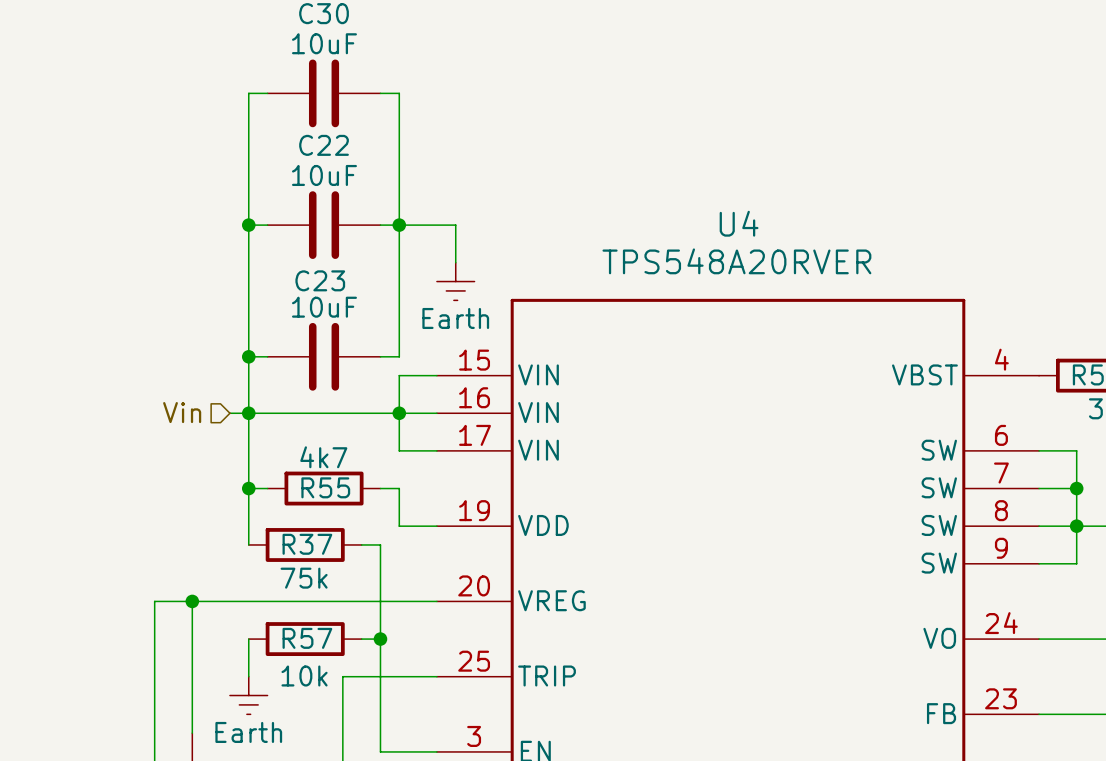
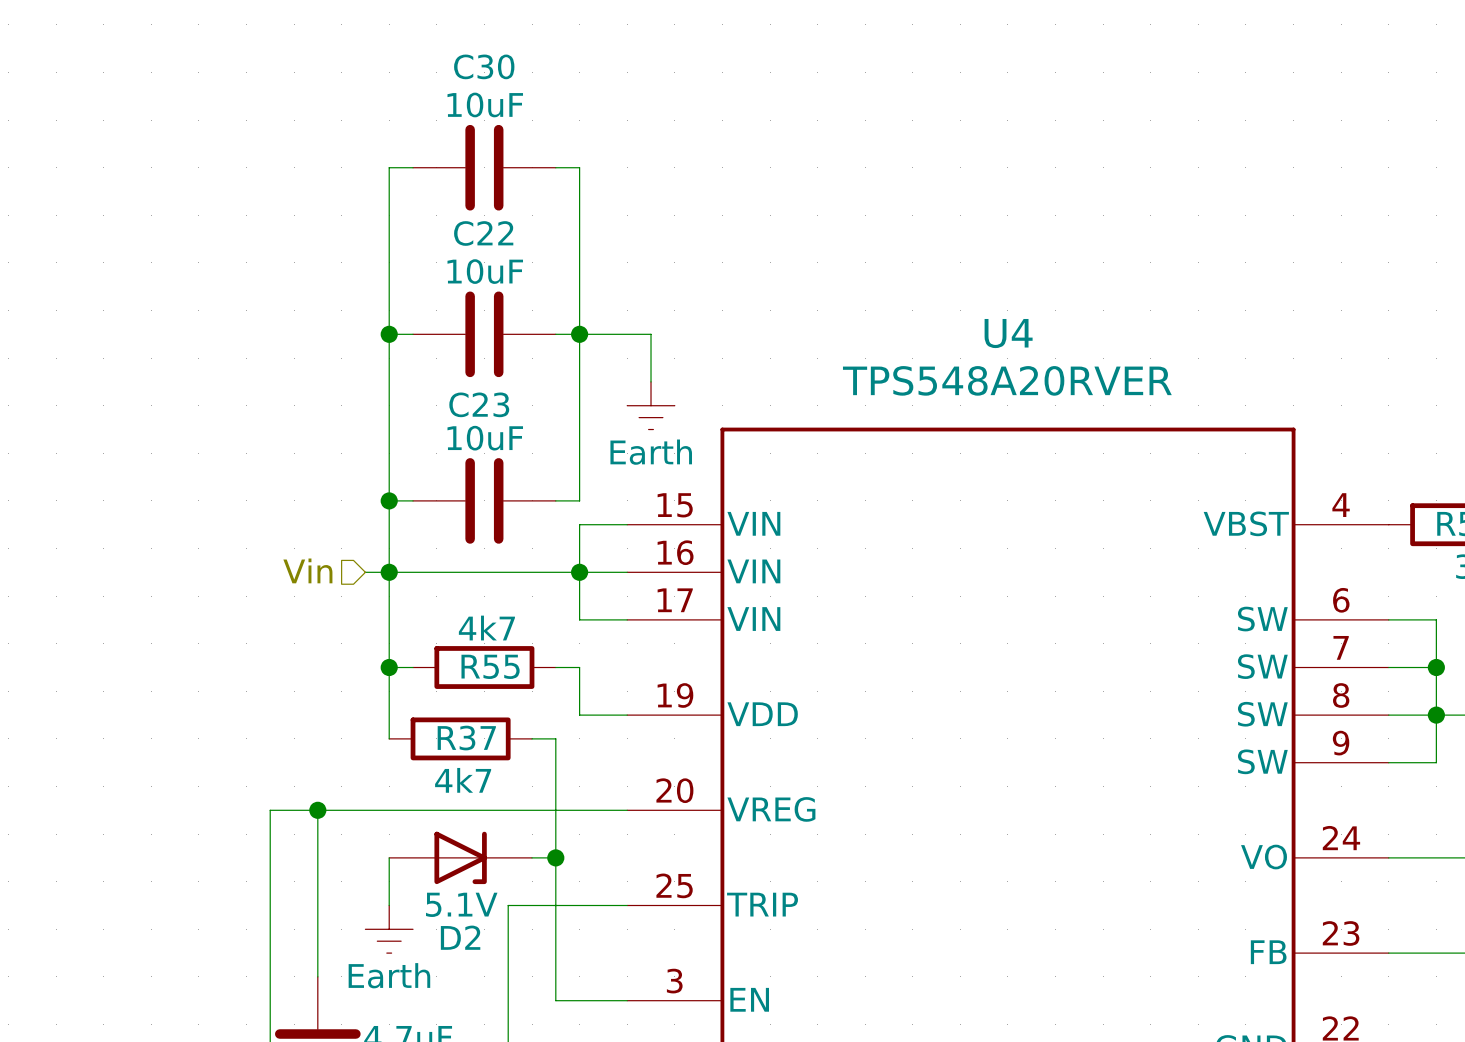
R37 value: 75k (304, 578) -> 4k7 (463, 780)
R57: 10k (305, 639) -> none
D2: none -> 5.1V (460, 857)

